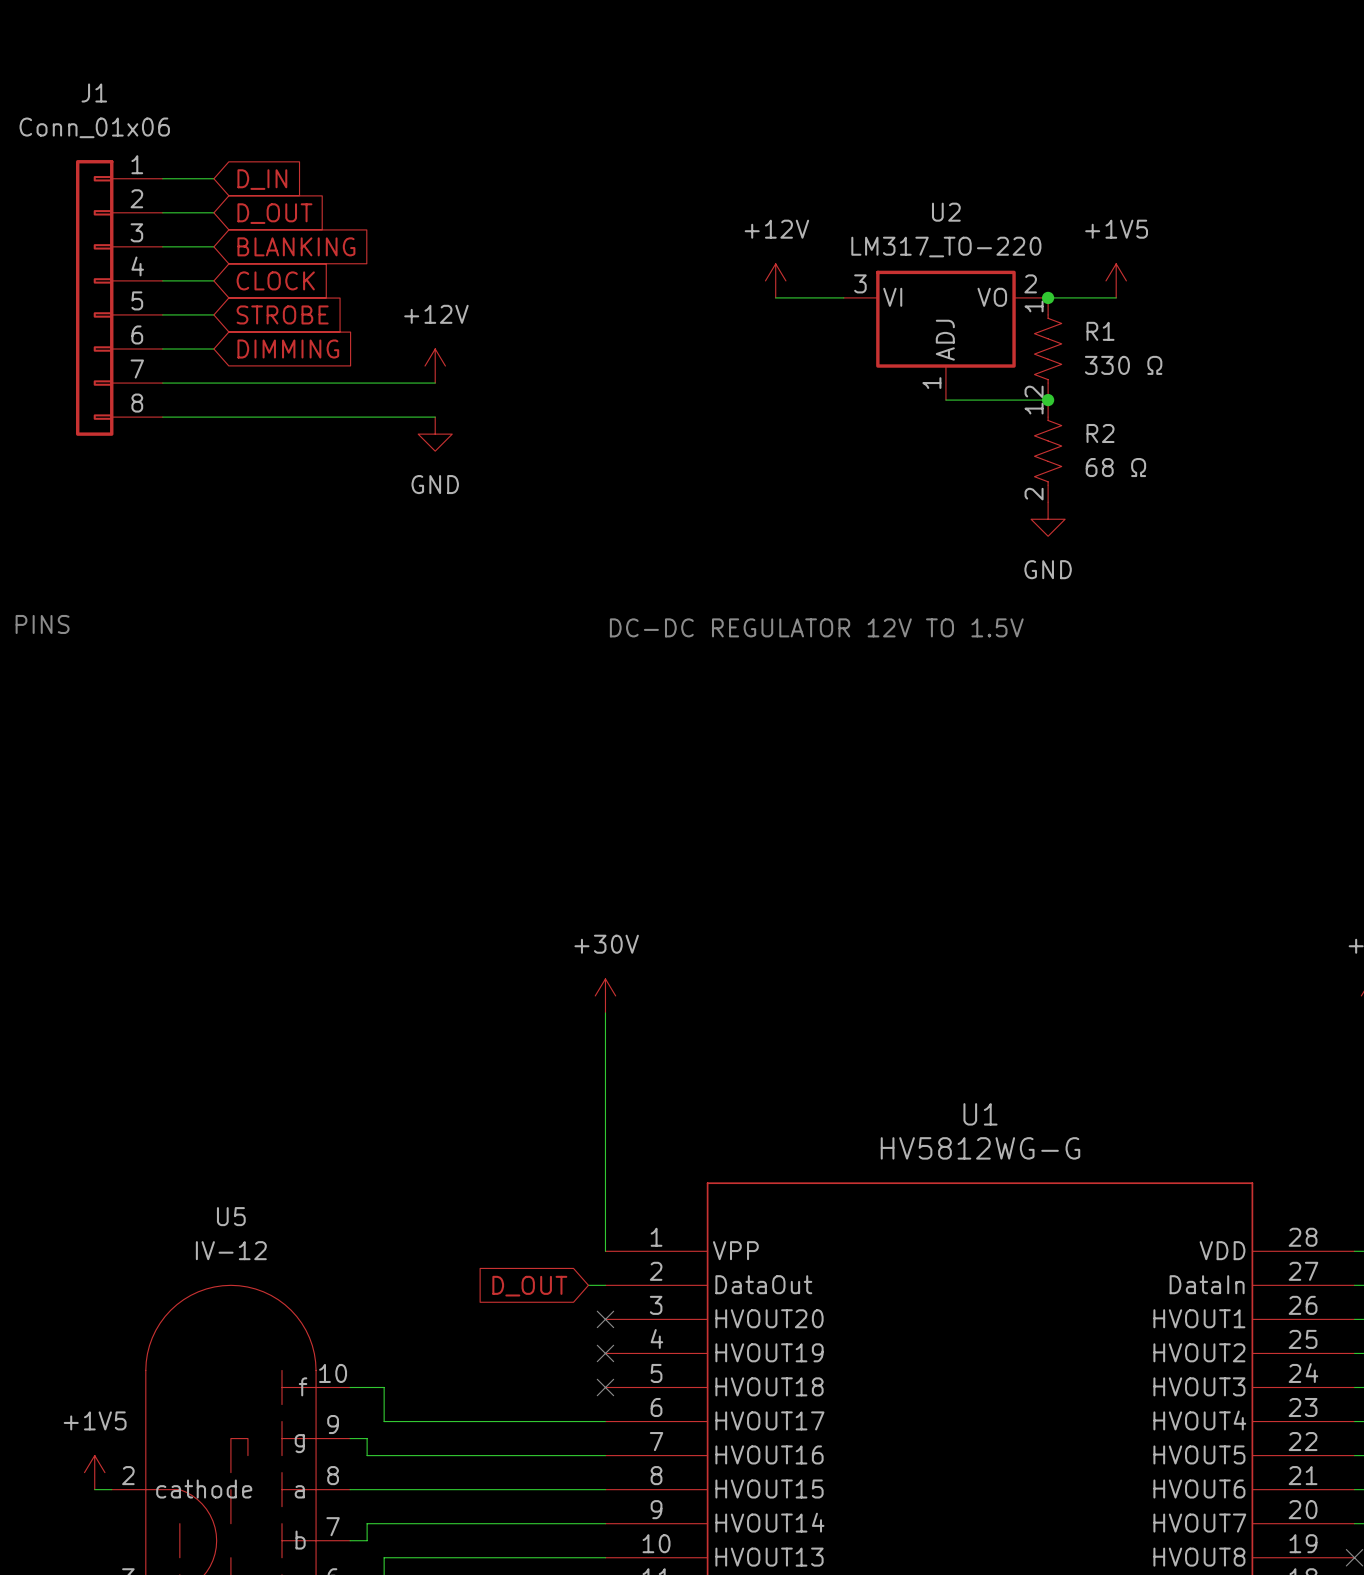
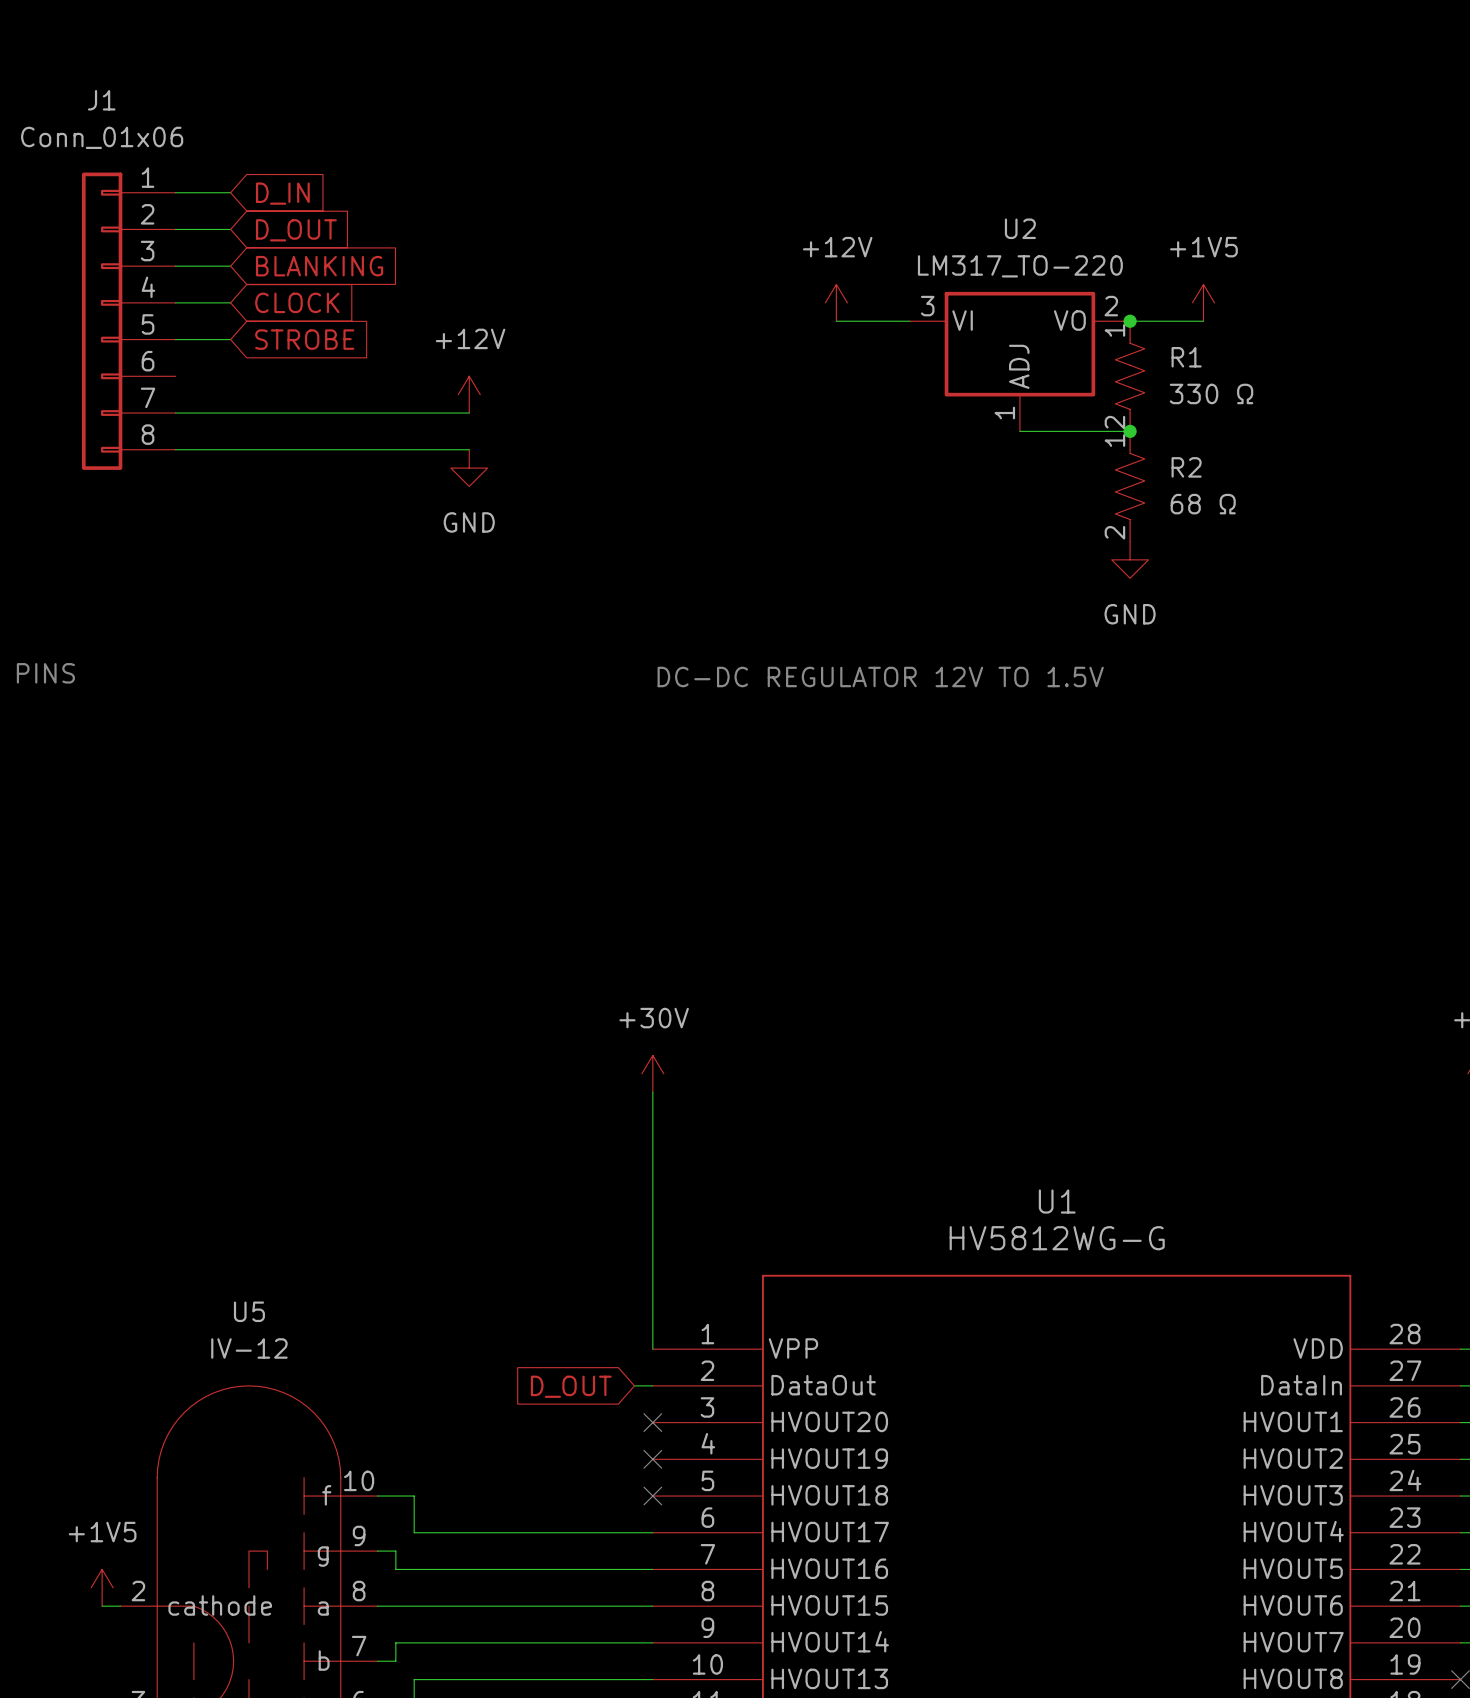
wire: (162, 349) (213, 349) -> none
global label: DIMMING (288, 349) -> none

